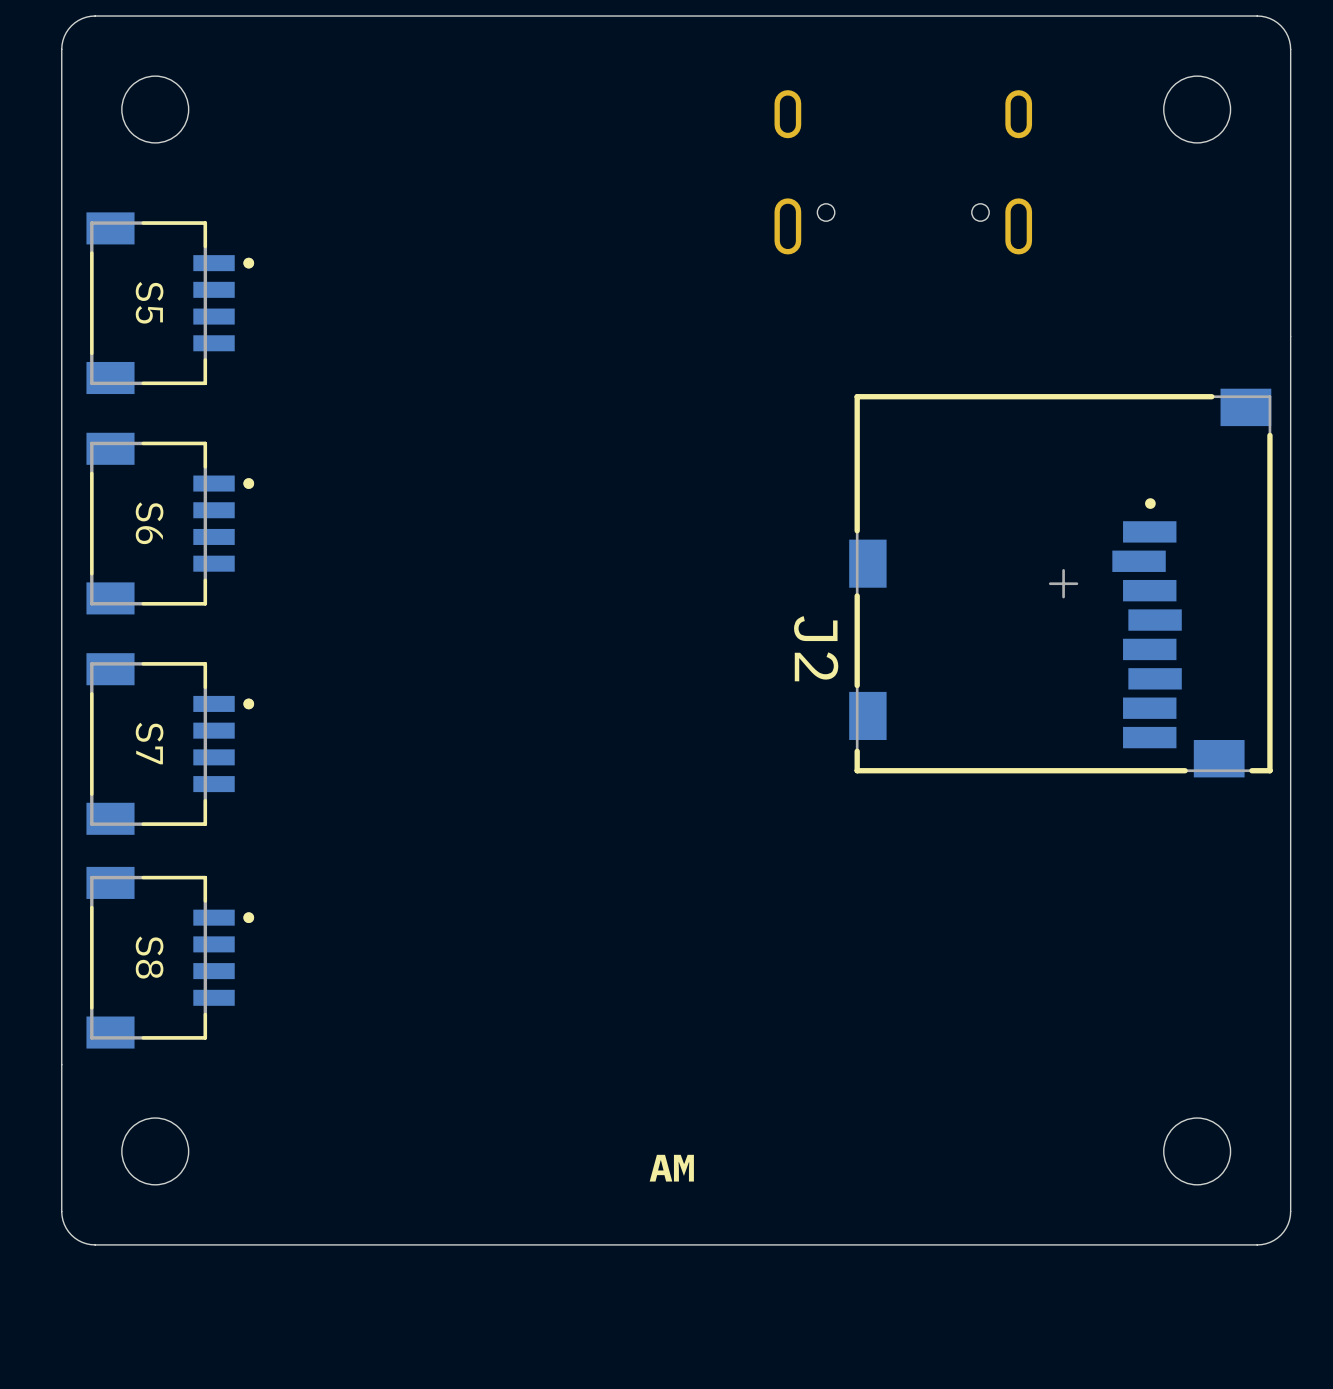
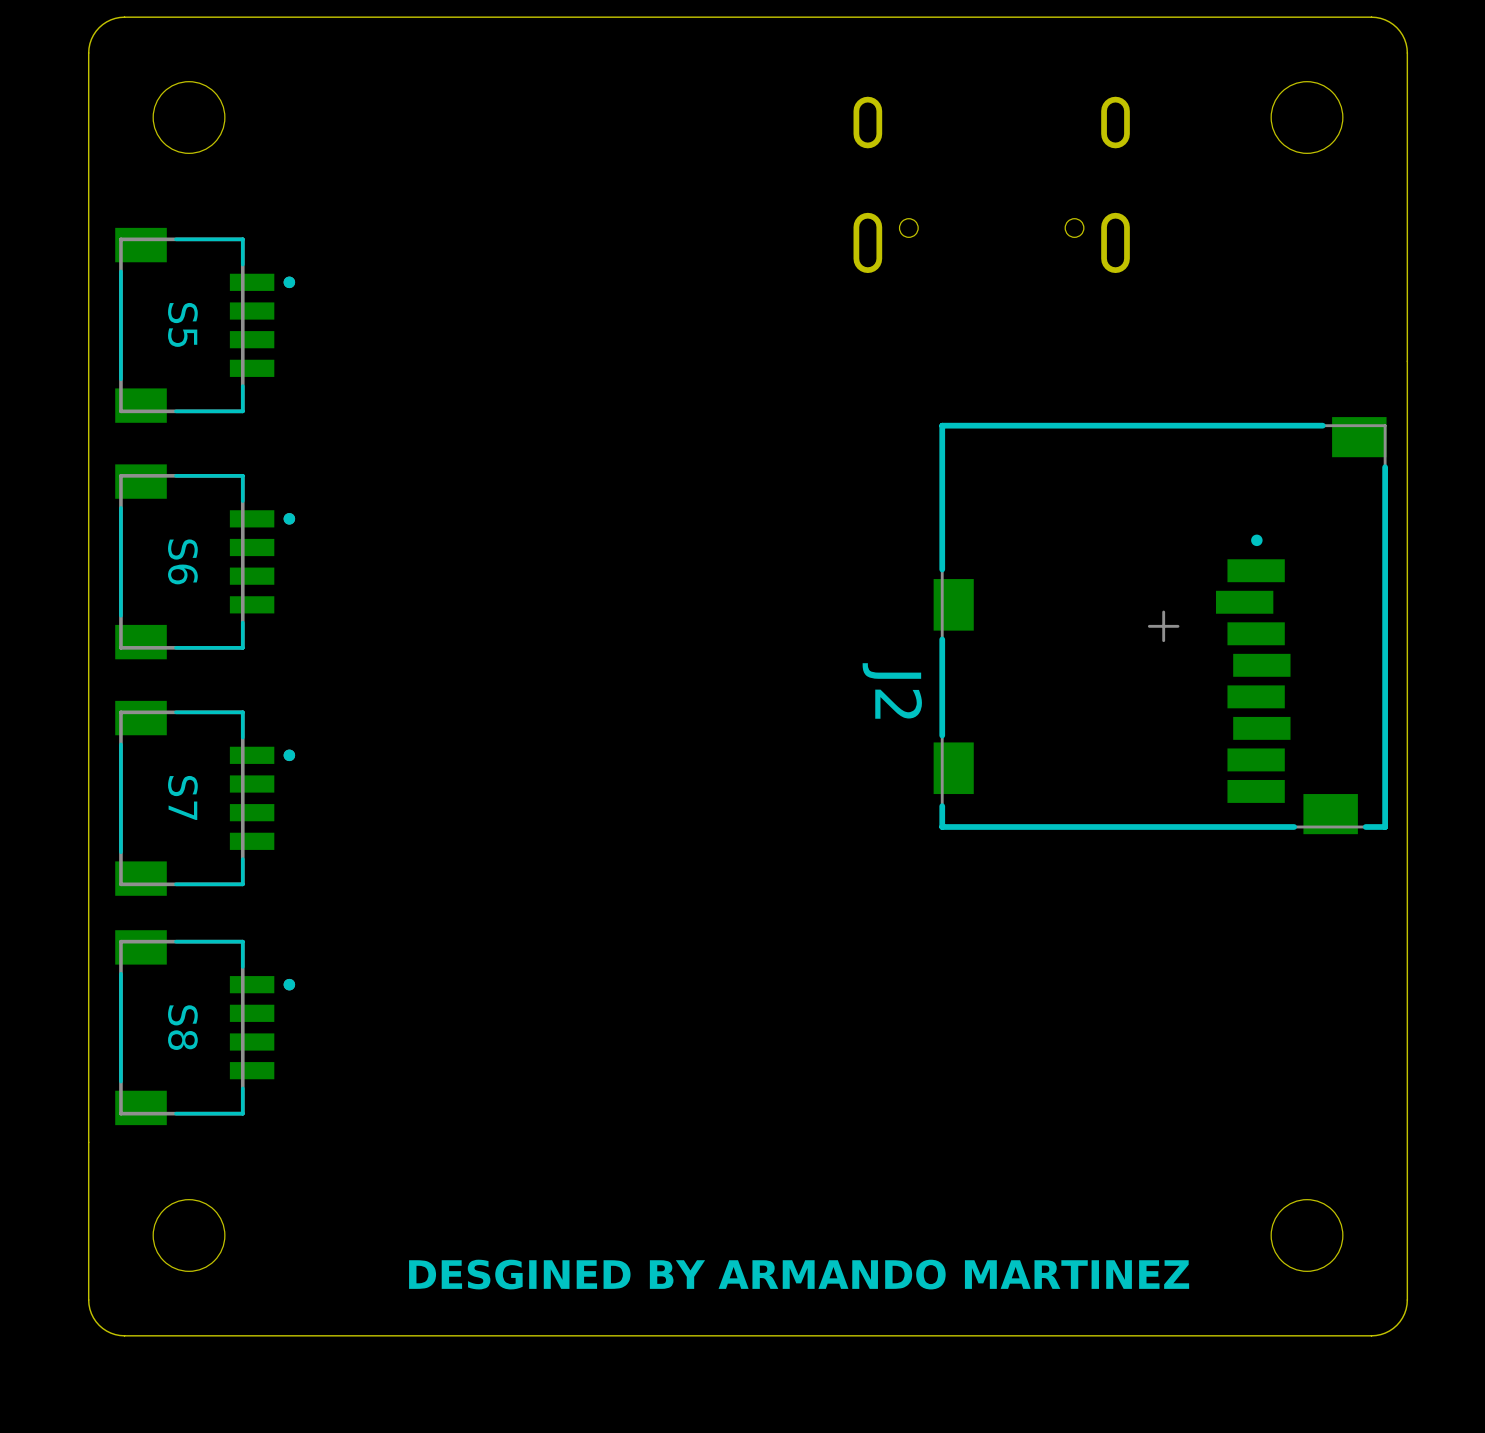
text: AM (671, 1168) -> none
text: none -> DESGINED BY ARMANDO MARTINEZ (799, 1274)

